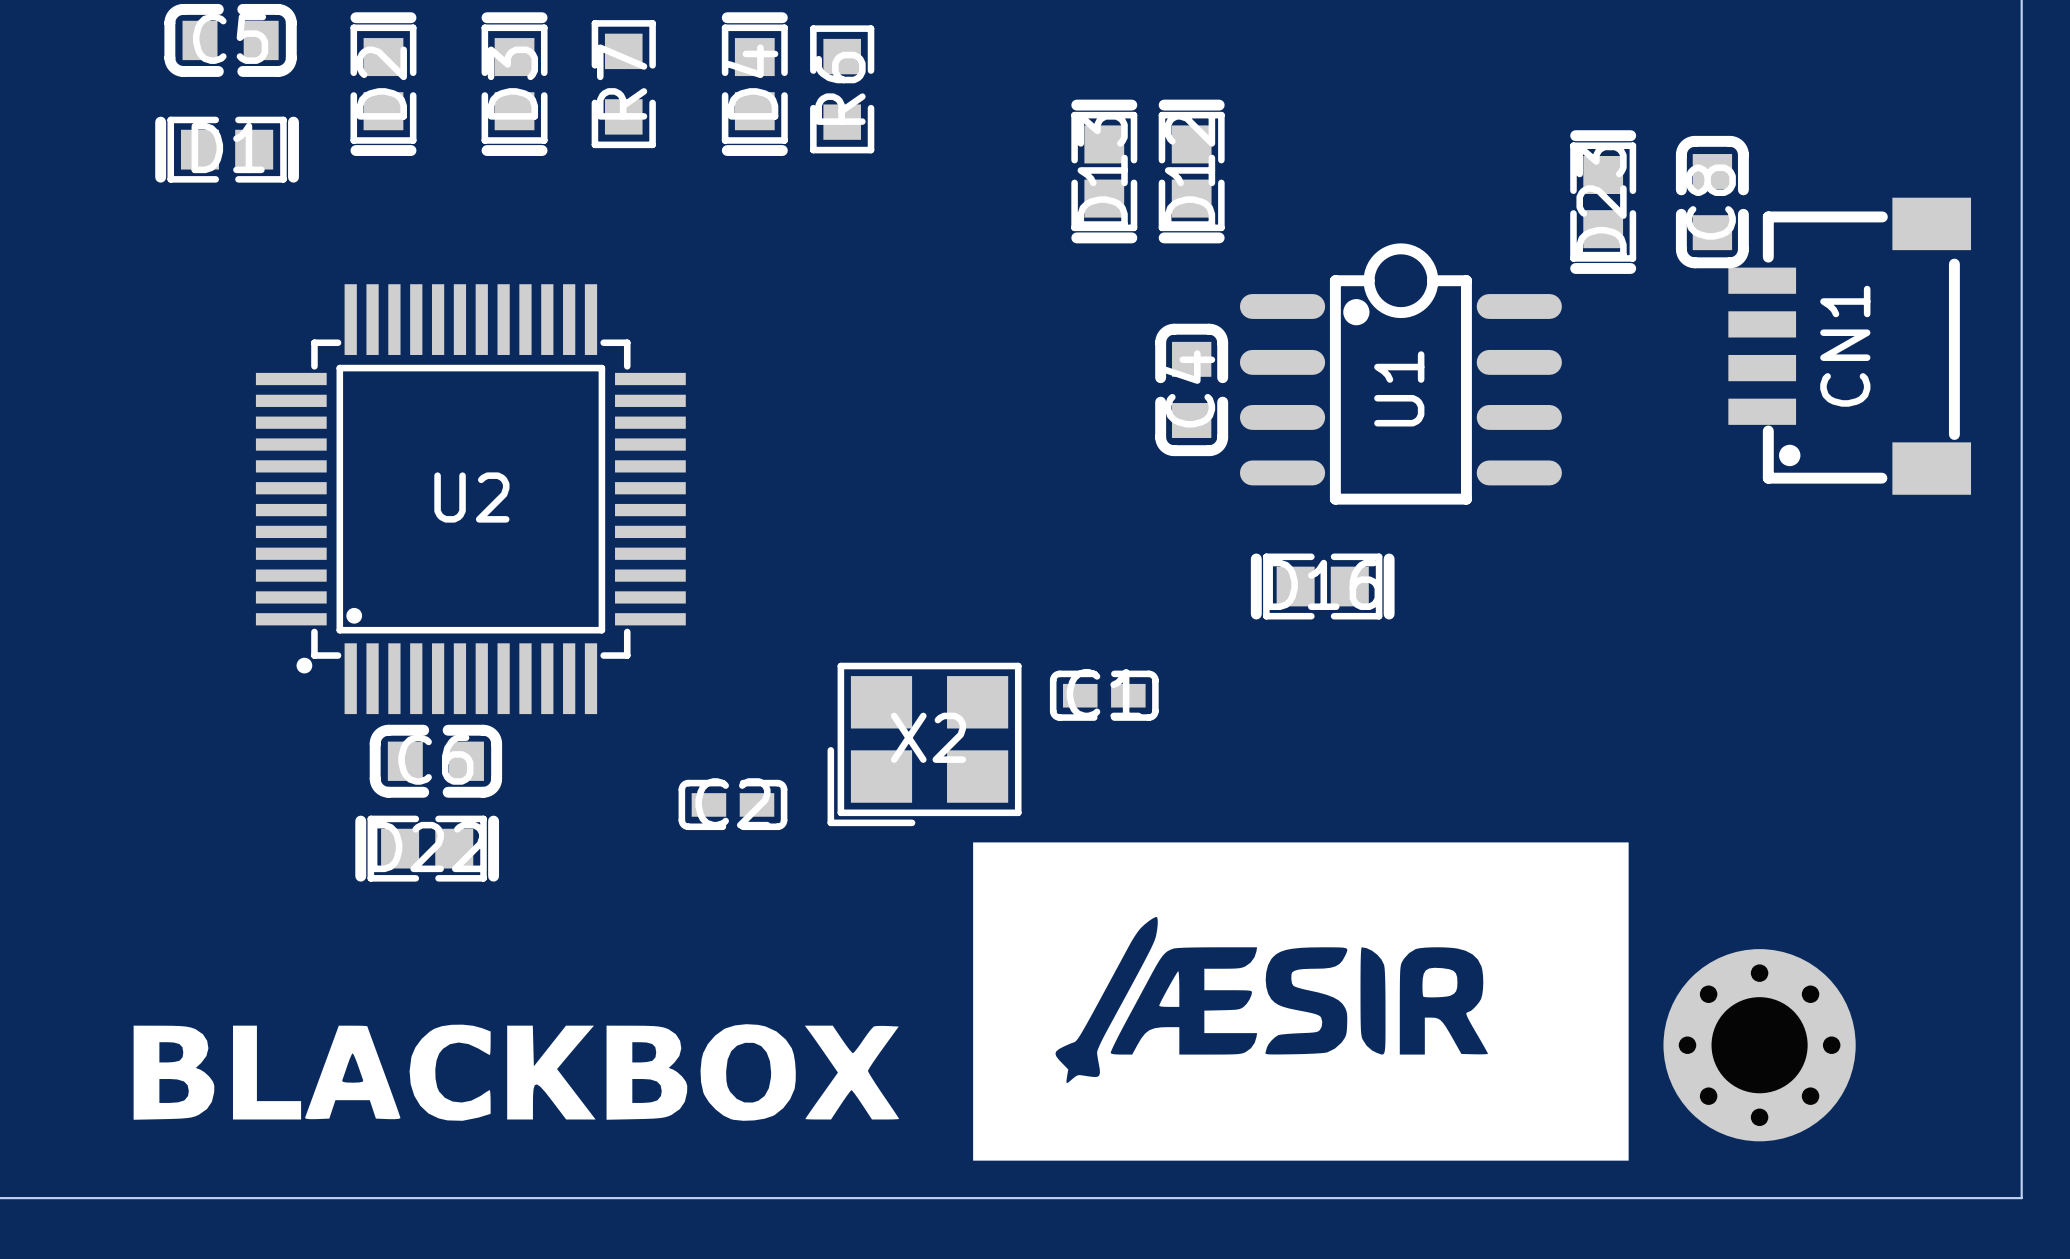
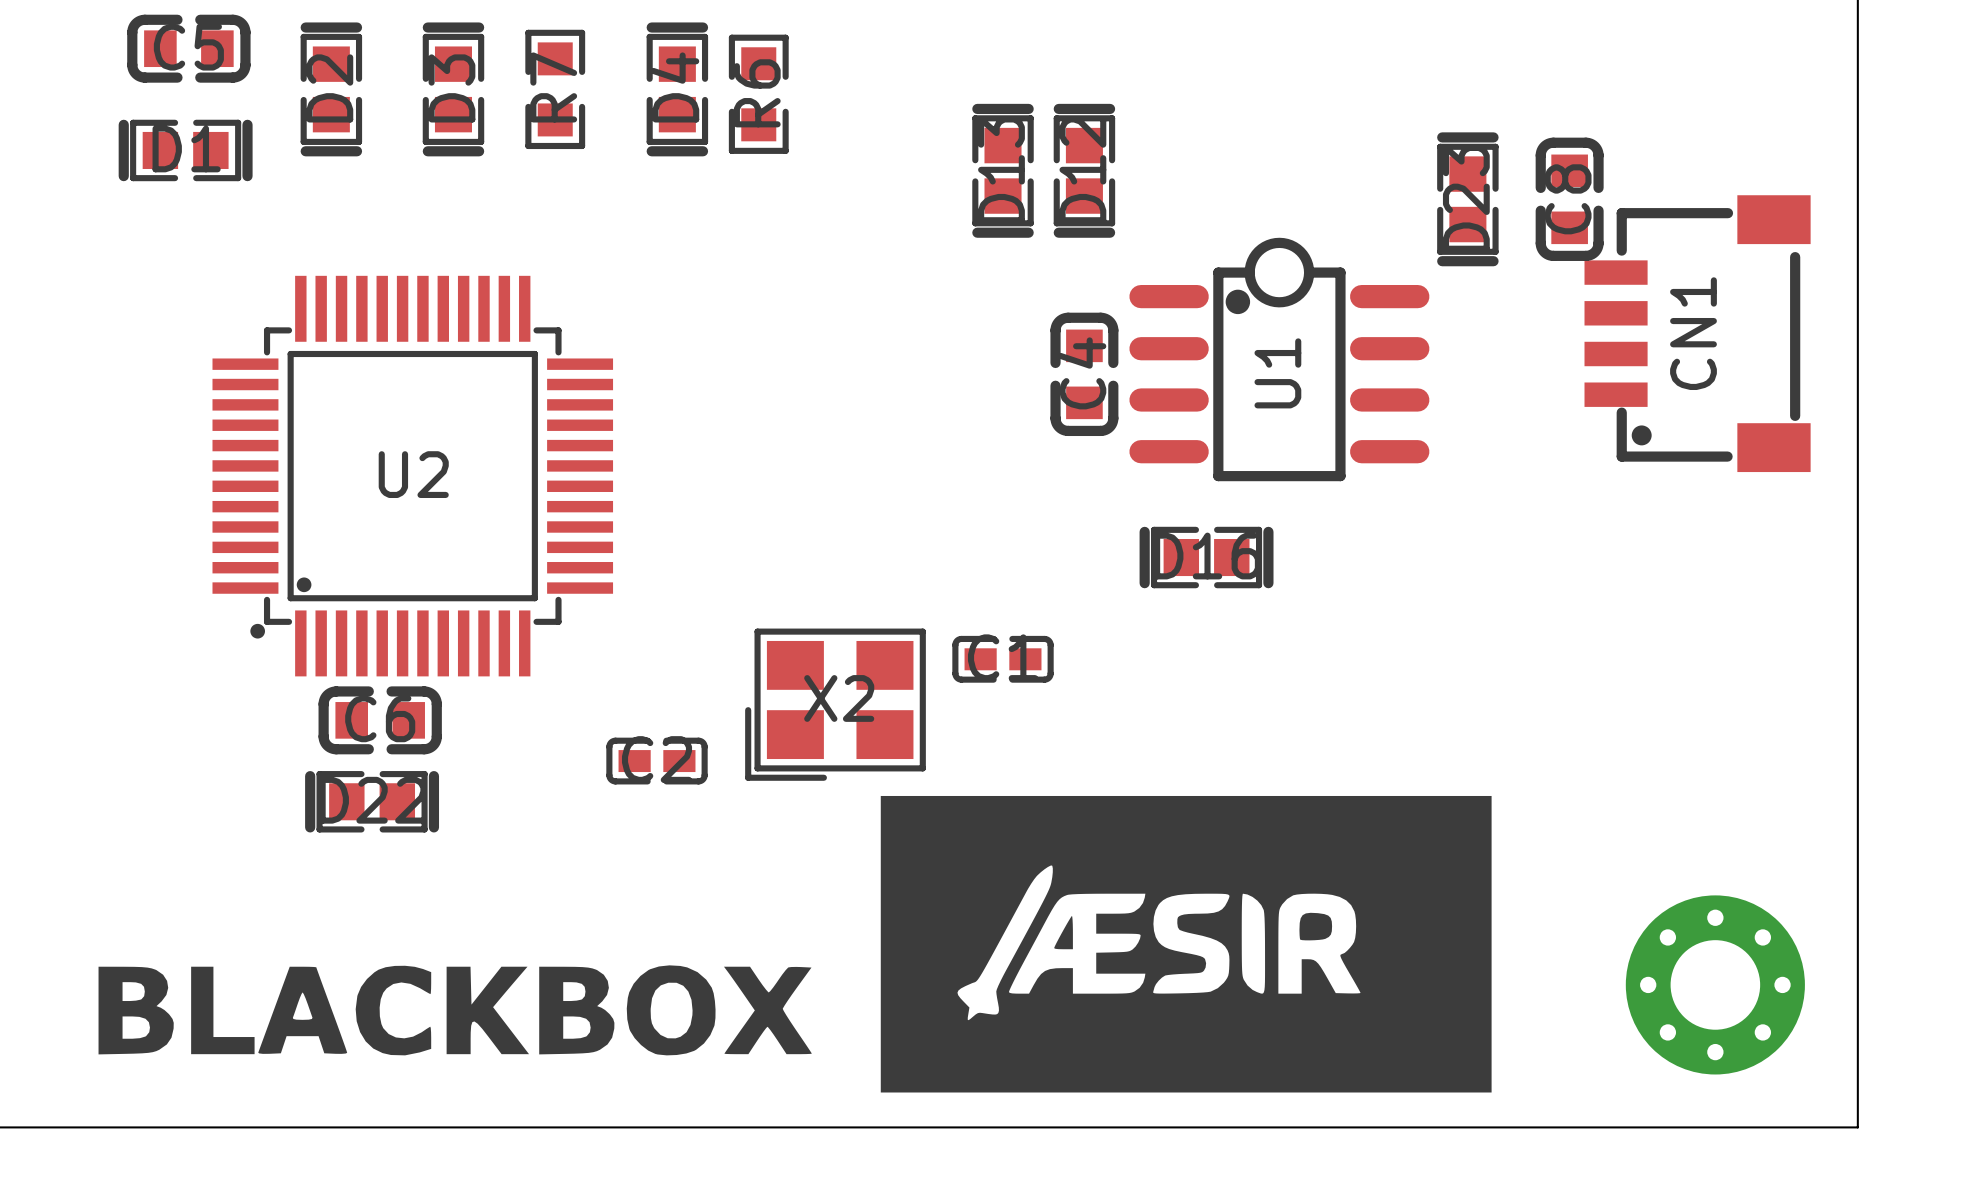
part position: (1759, 1045) -> (1715, 984)

